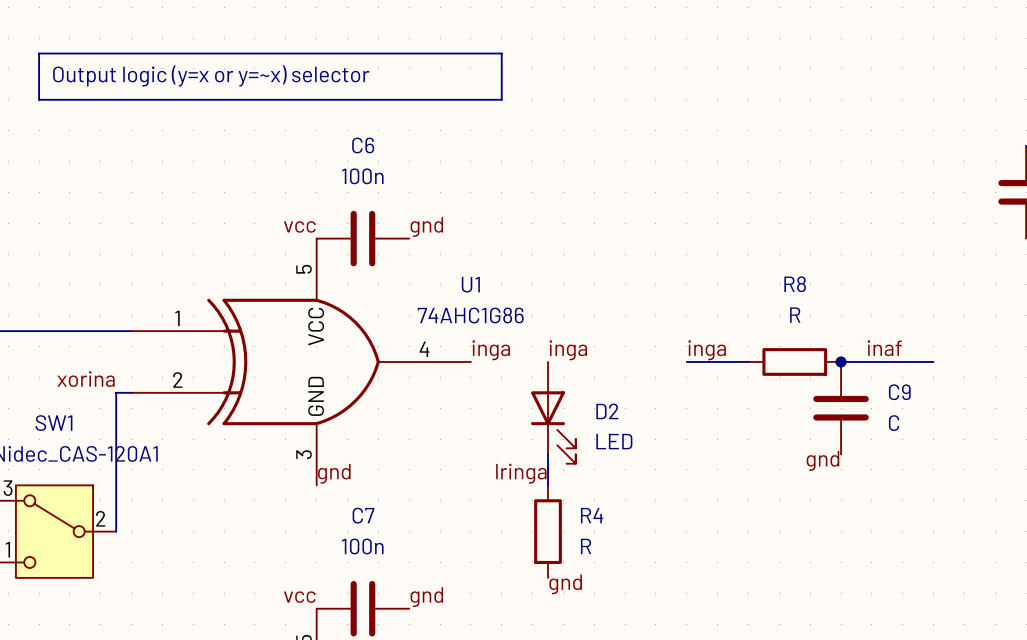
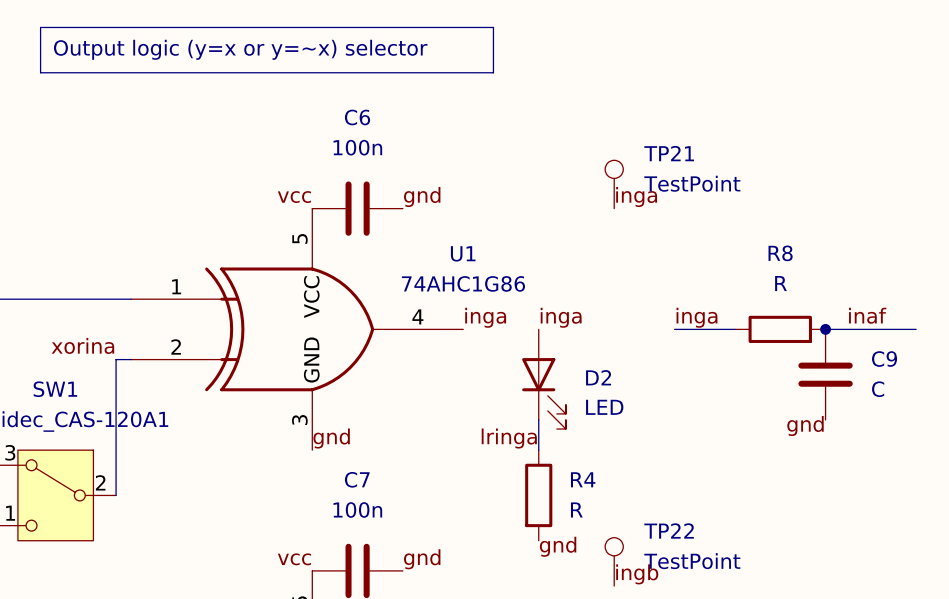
TP21: none -> TestPoint (614, 184)
label: none -> inga (636, 196)
TP22: none -> TestPoint (614, 561)
label: none -> ingb (637, 574)

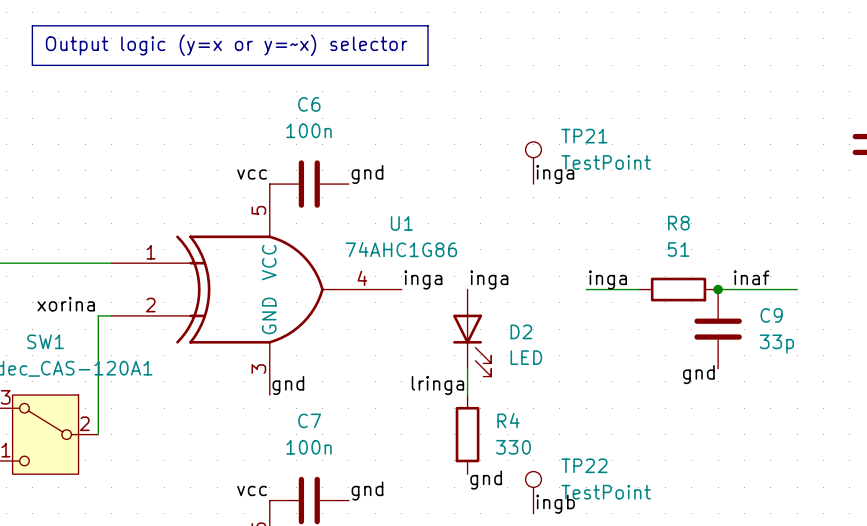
R8 value: R (780, 283) -> 51 (678, 249)
C9 value: C (878, 389) -> 33p (776, 344)
R4 value: R (576, 509) -> 330 (513, 447)

